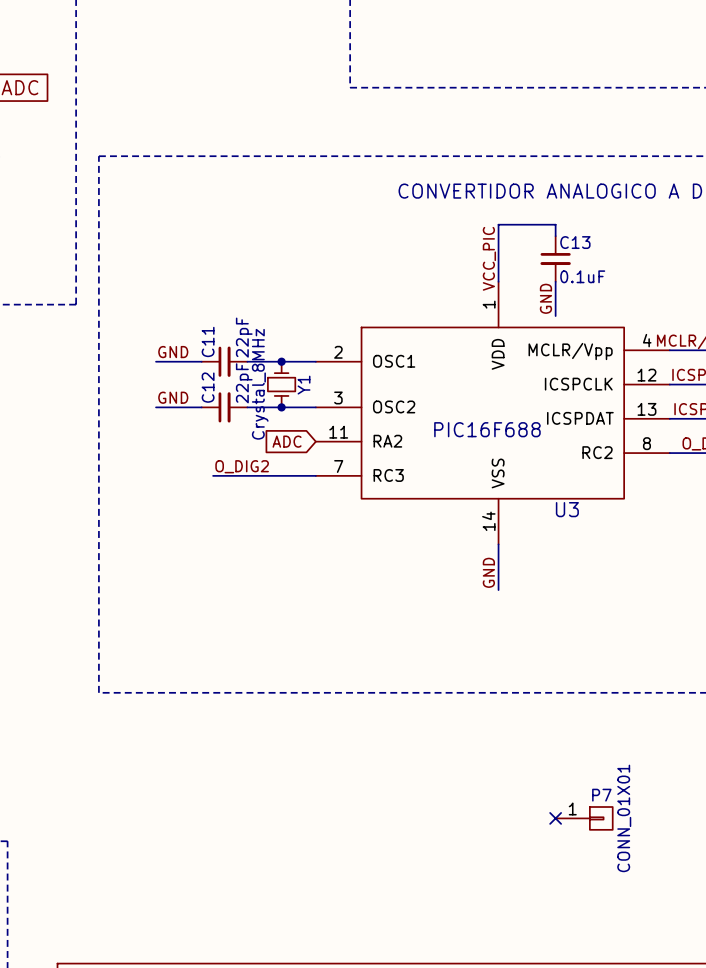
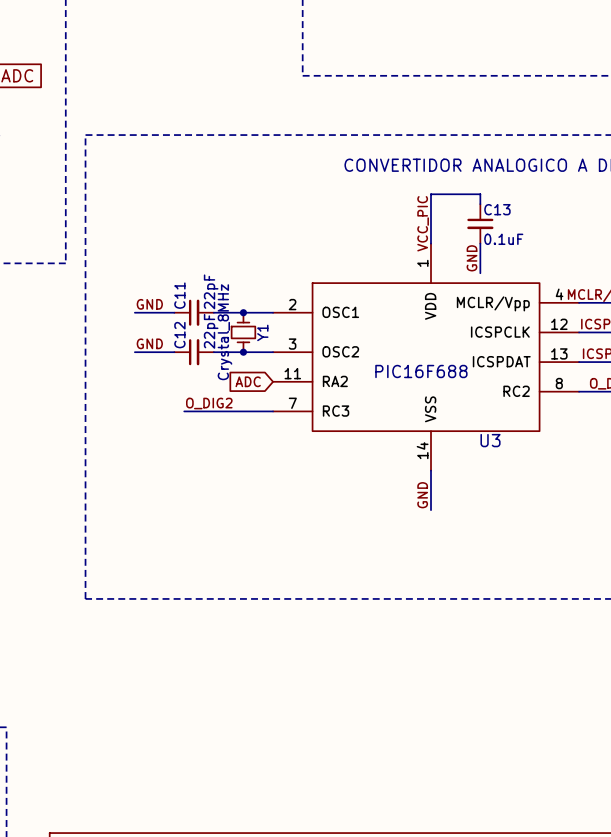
no-connect mark: (555, 818) -> none
P7: CONN_01X01 (584, 818) -> none

